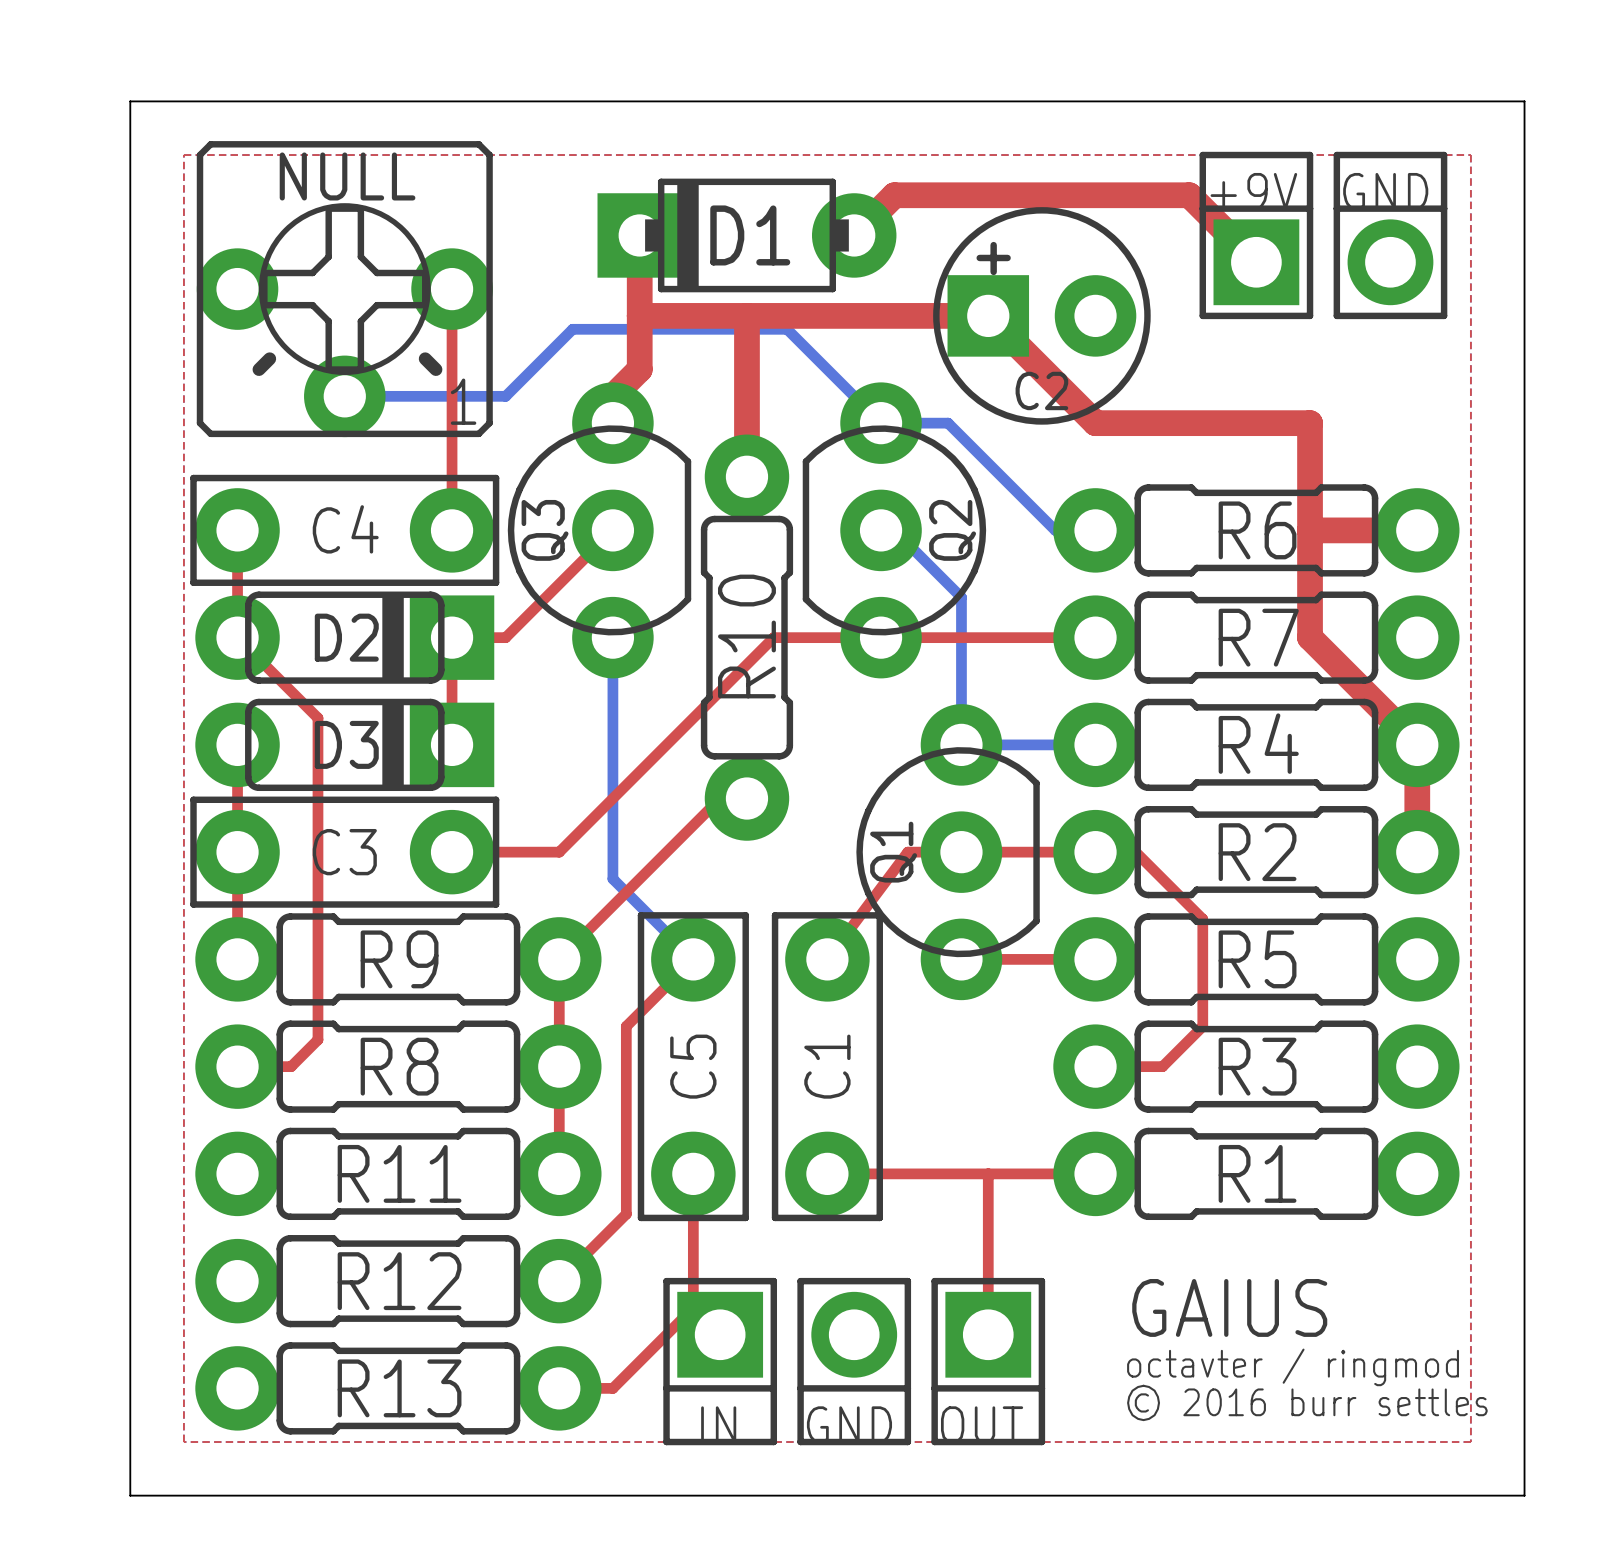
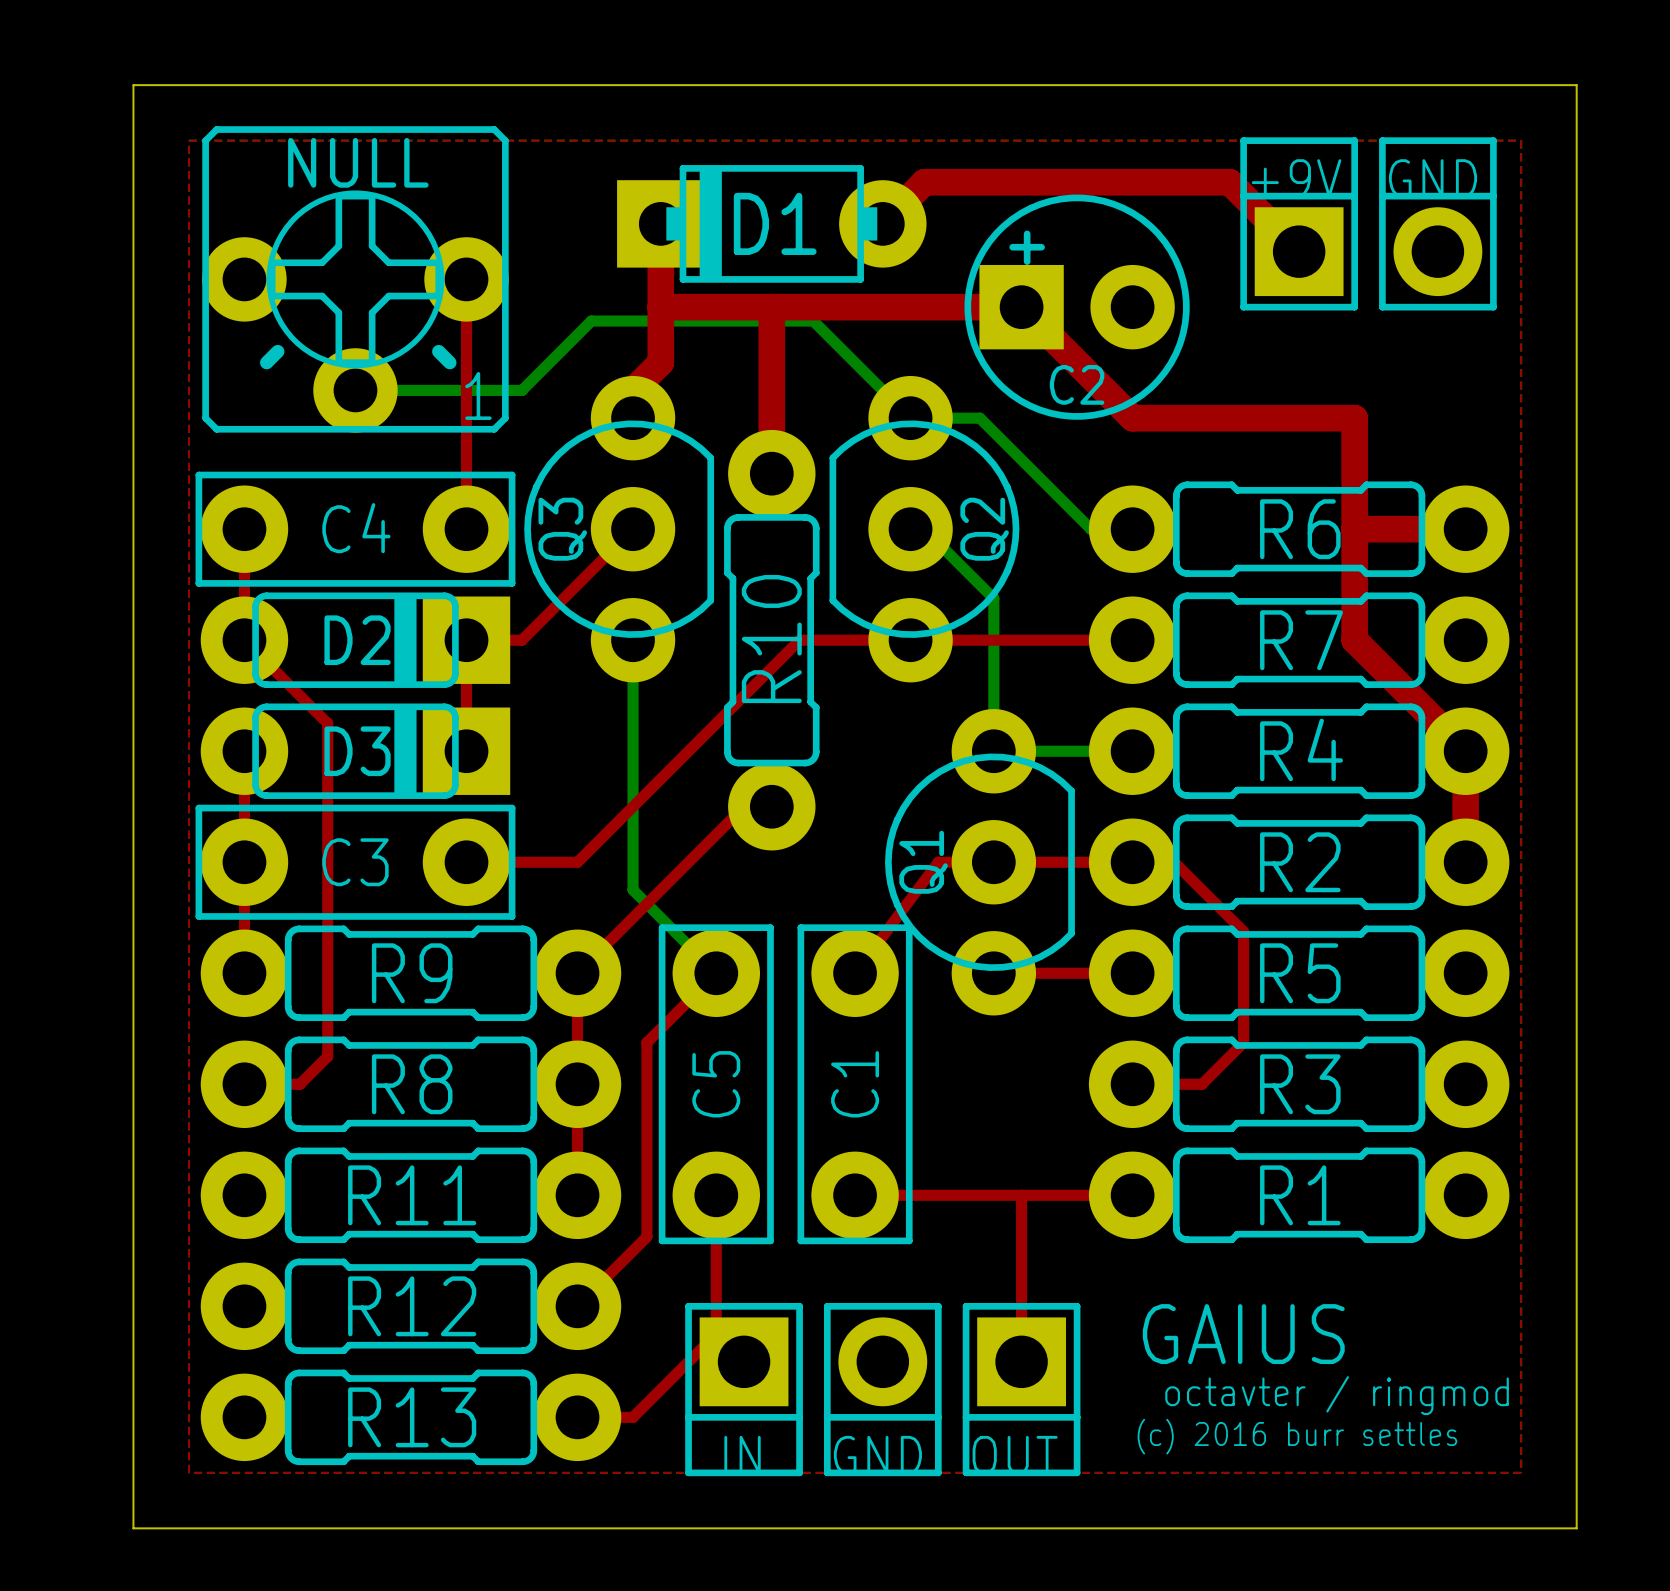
text position: GAIUS (1229, 1307) -> GAIUS (1243, 1334)
text: © 2016 burr settles (1307, 1402) -> (c) 2016 burr settles (1297, 1436)

